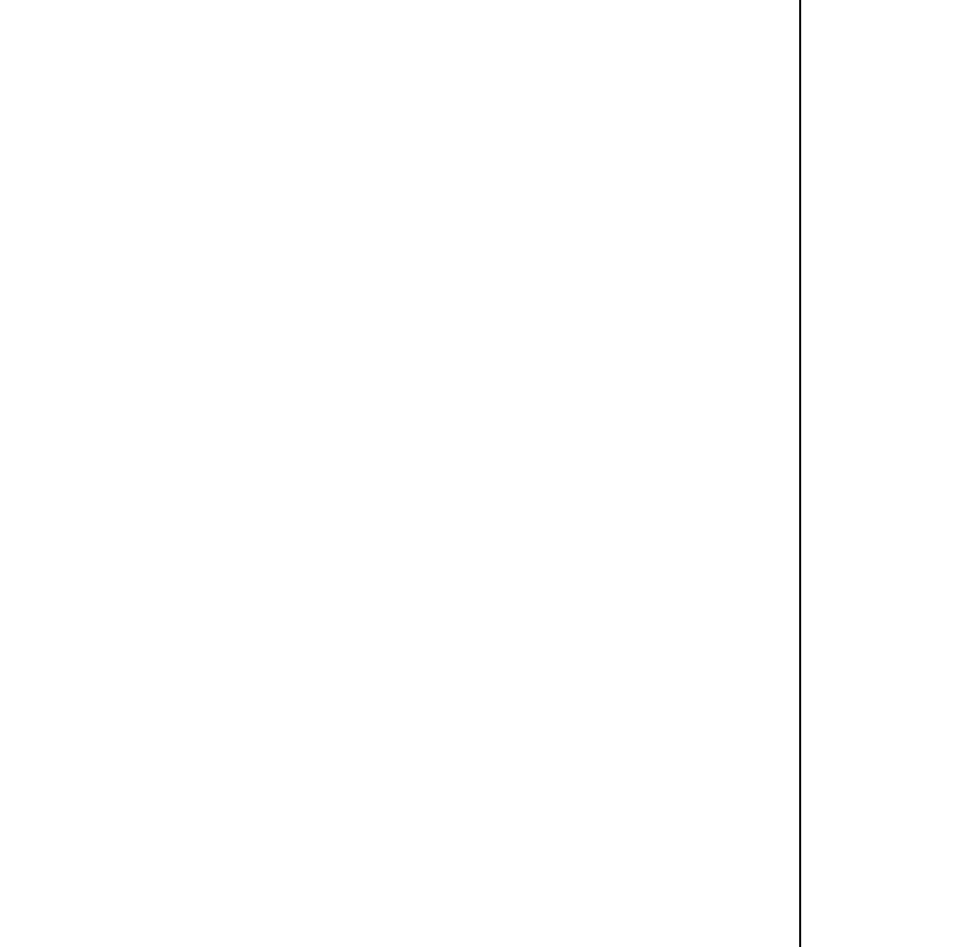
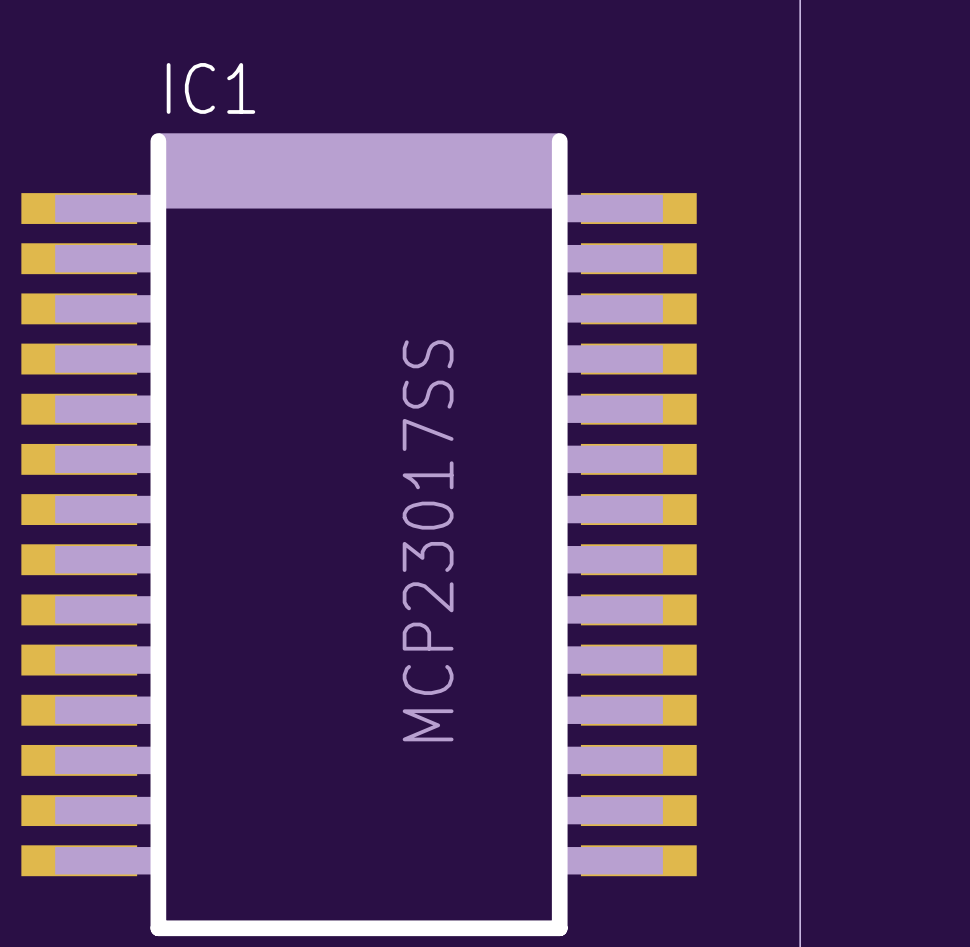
IC1: none -> MCP23017SS (359, 534)

